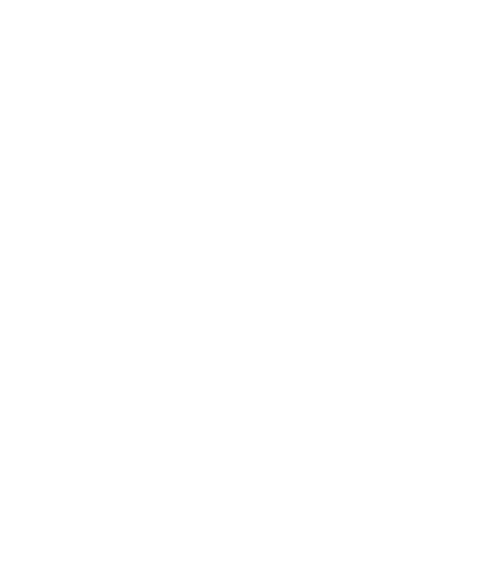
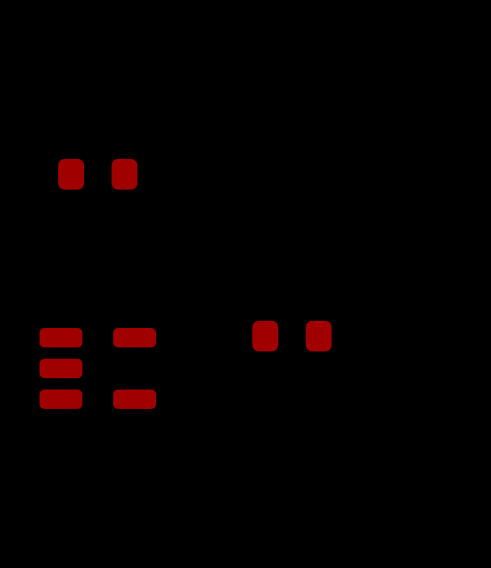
part: none -> (97, 174)
part: none -> (291, 336)
part: none -> (97, 368)

